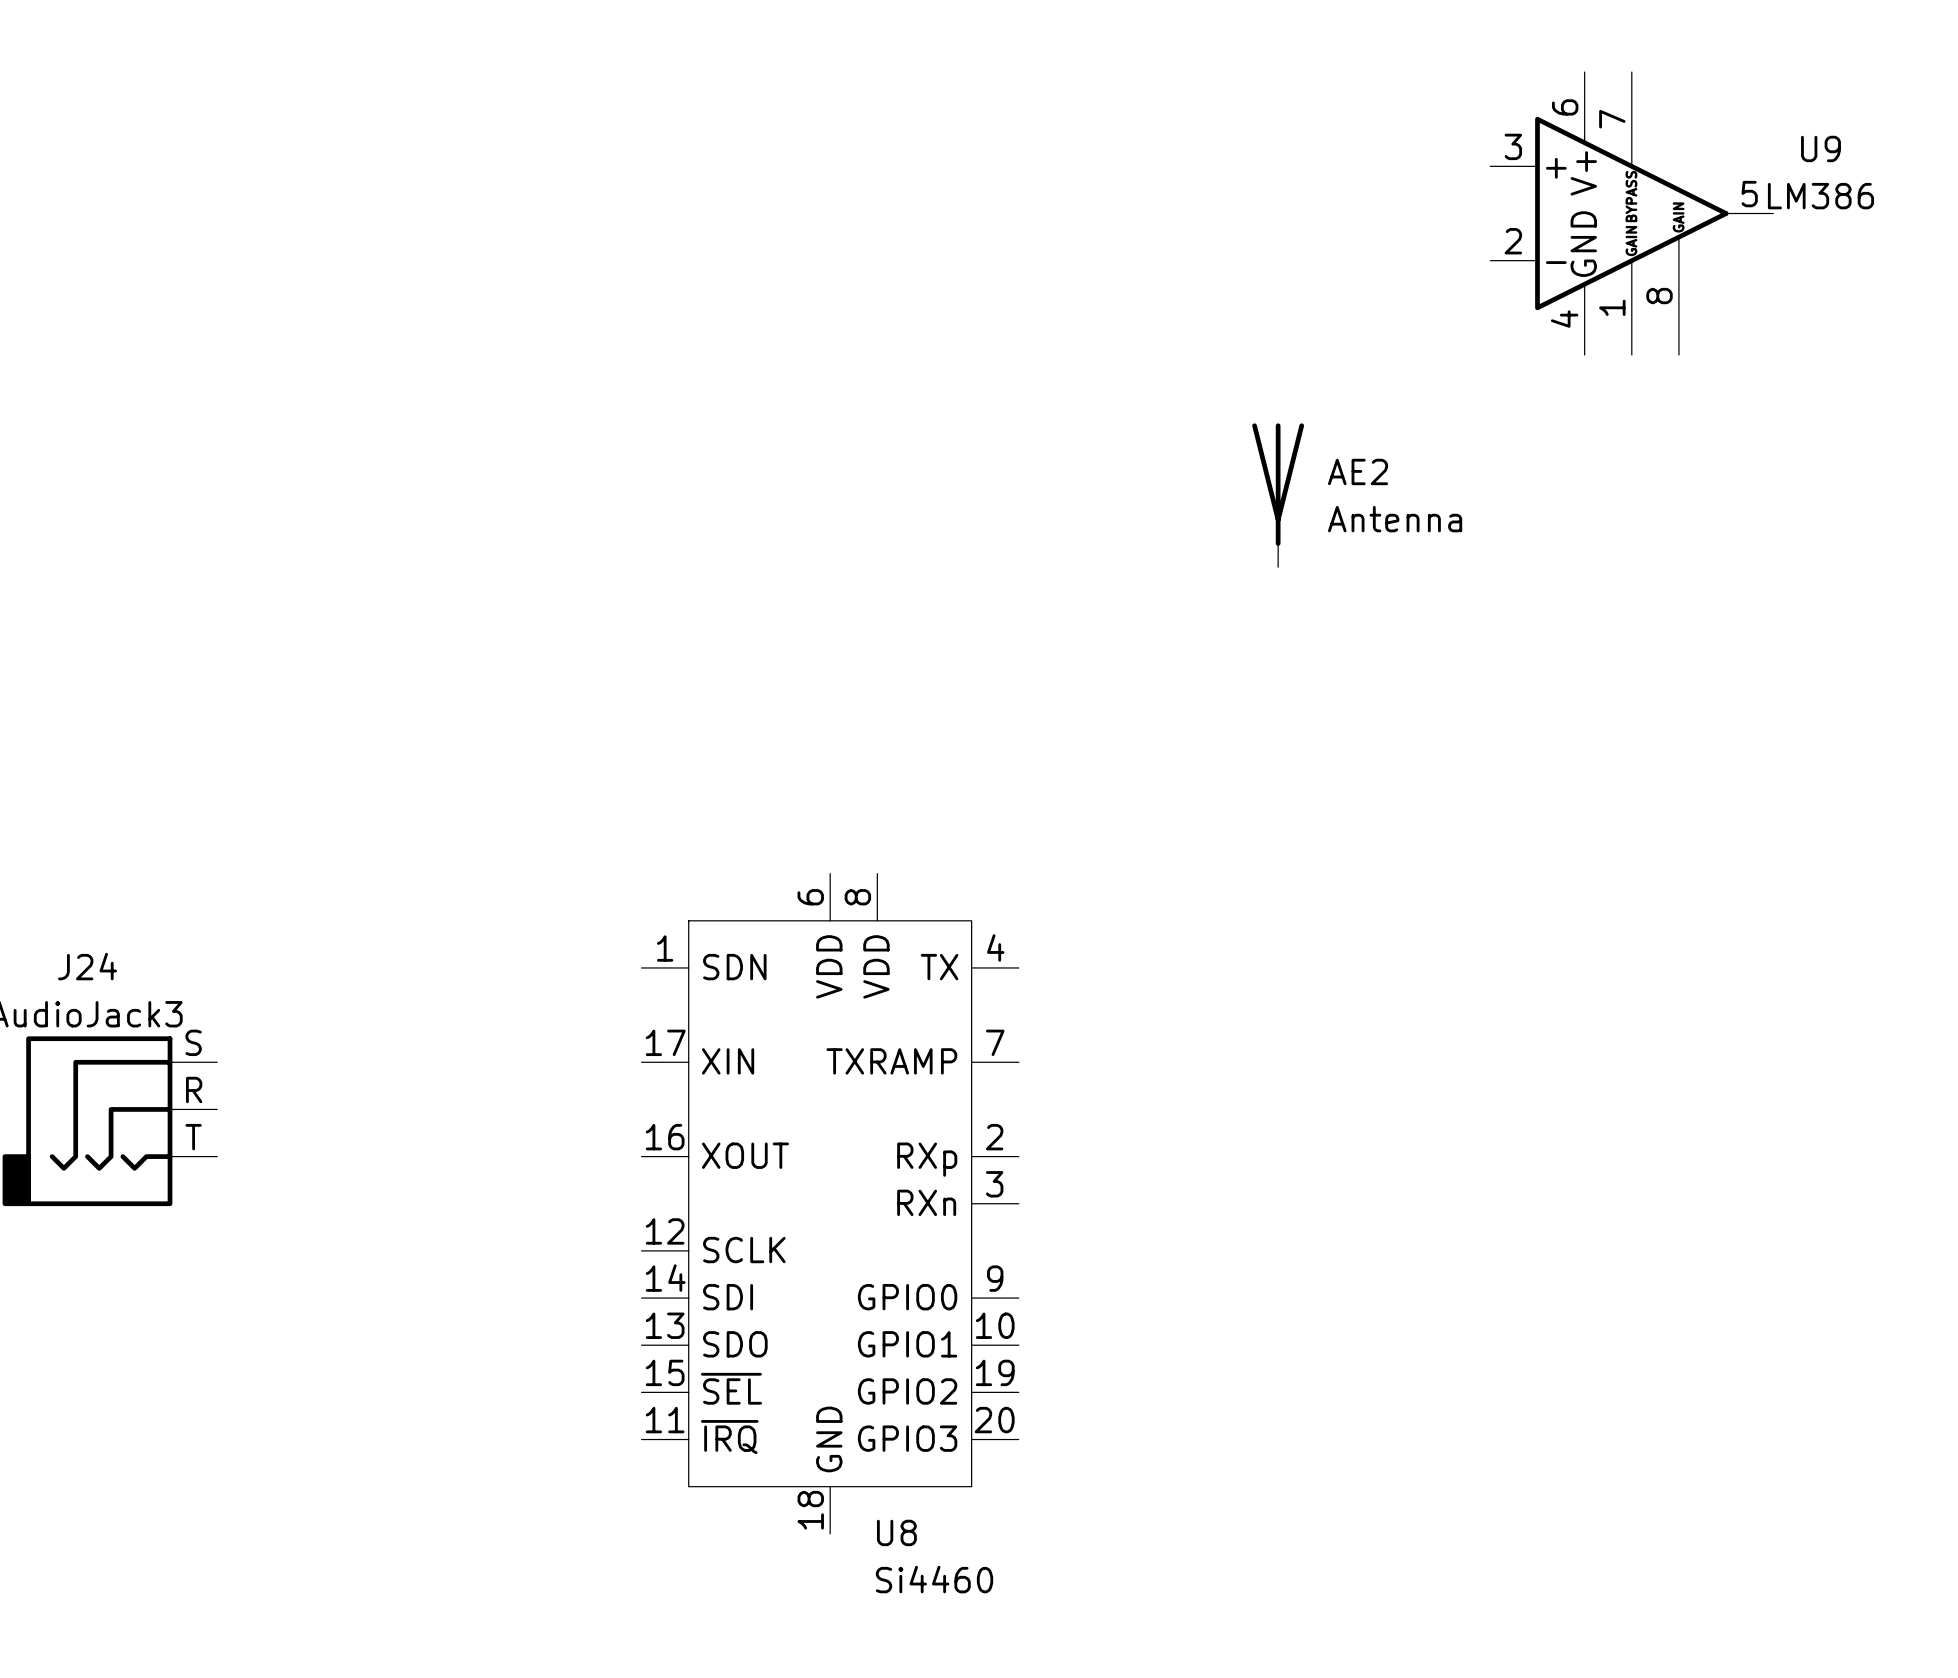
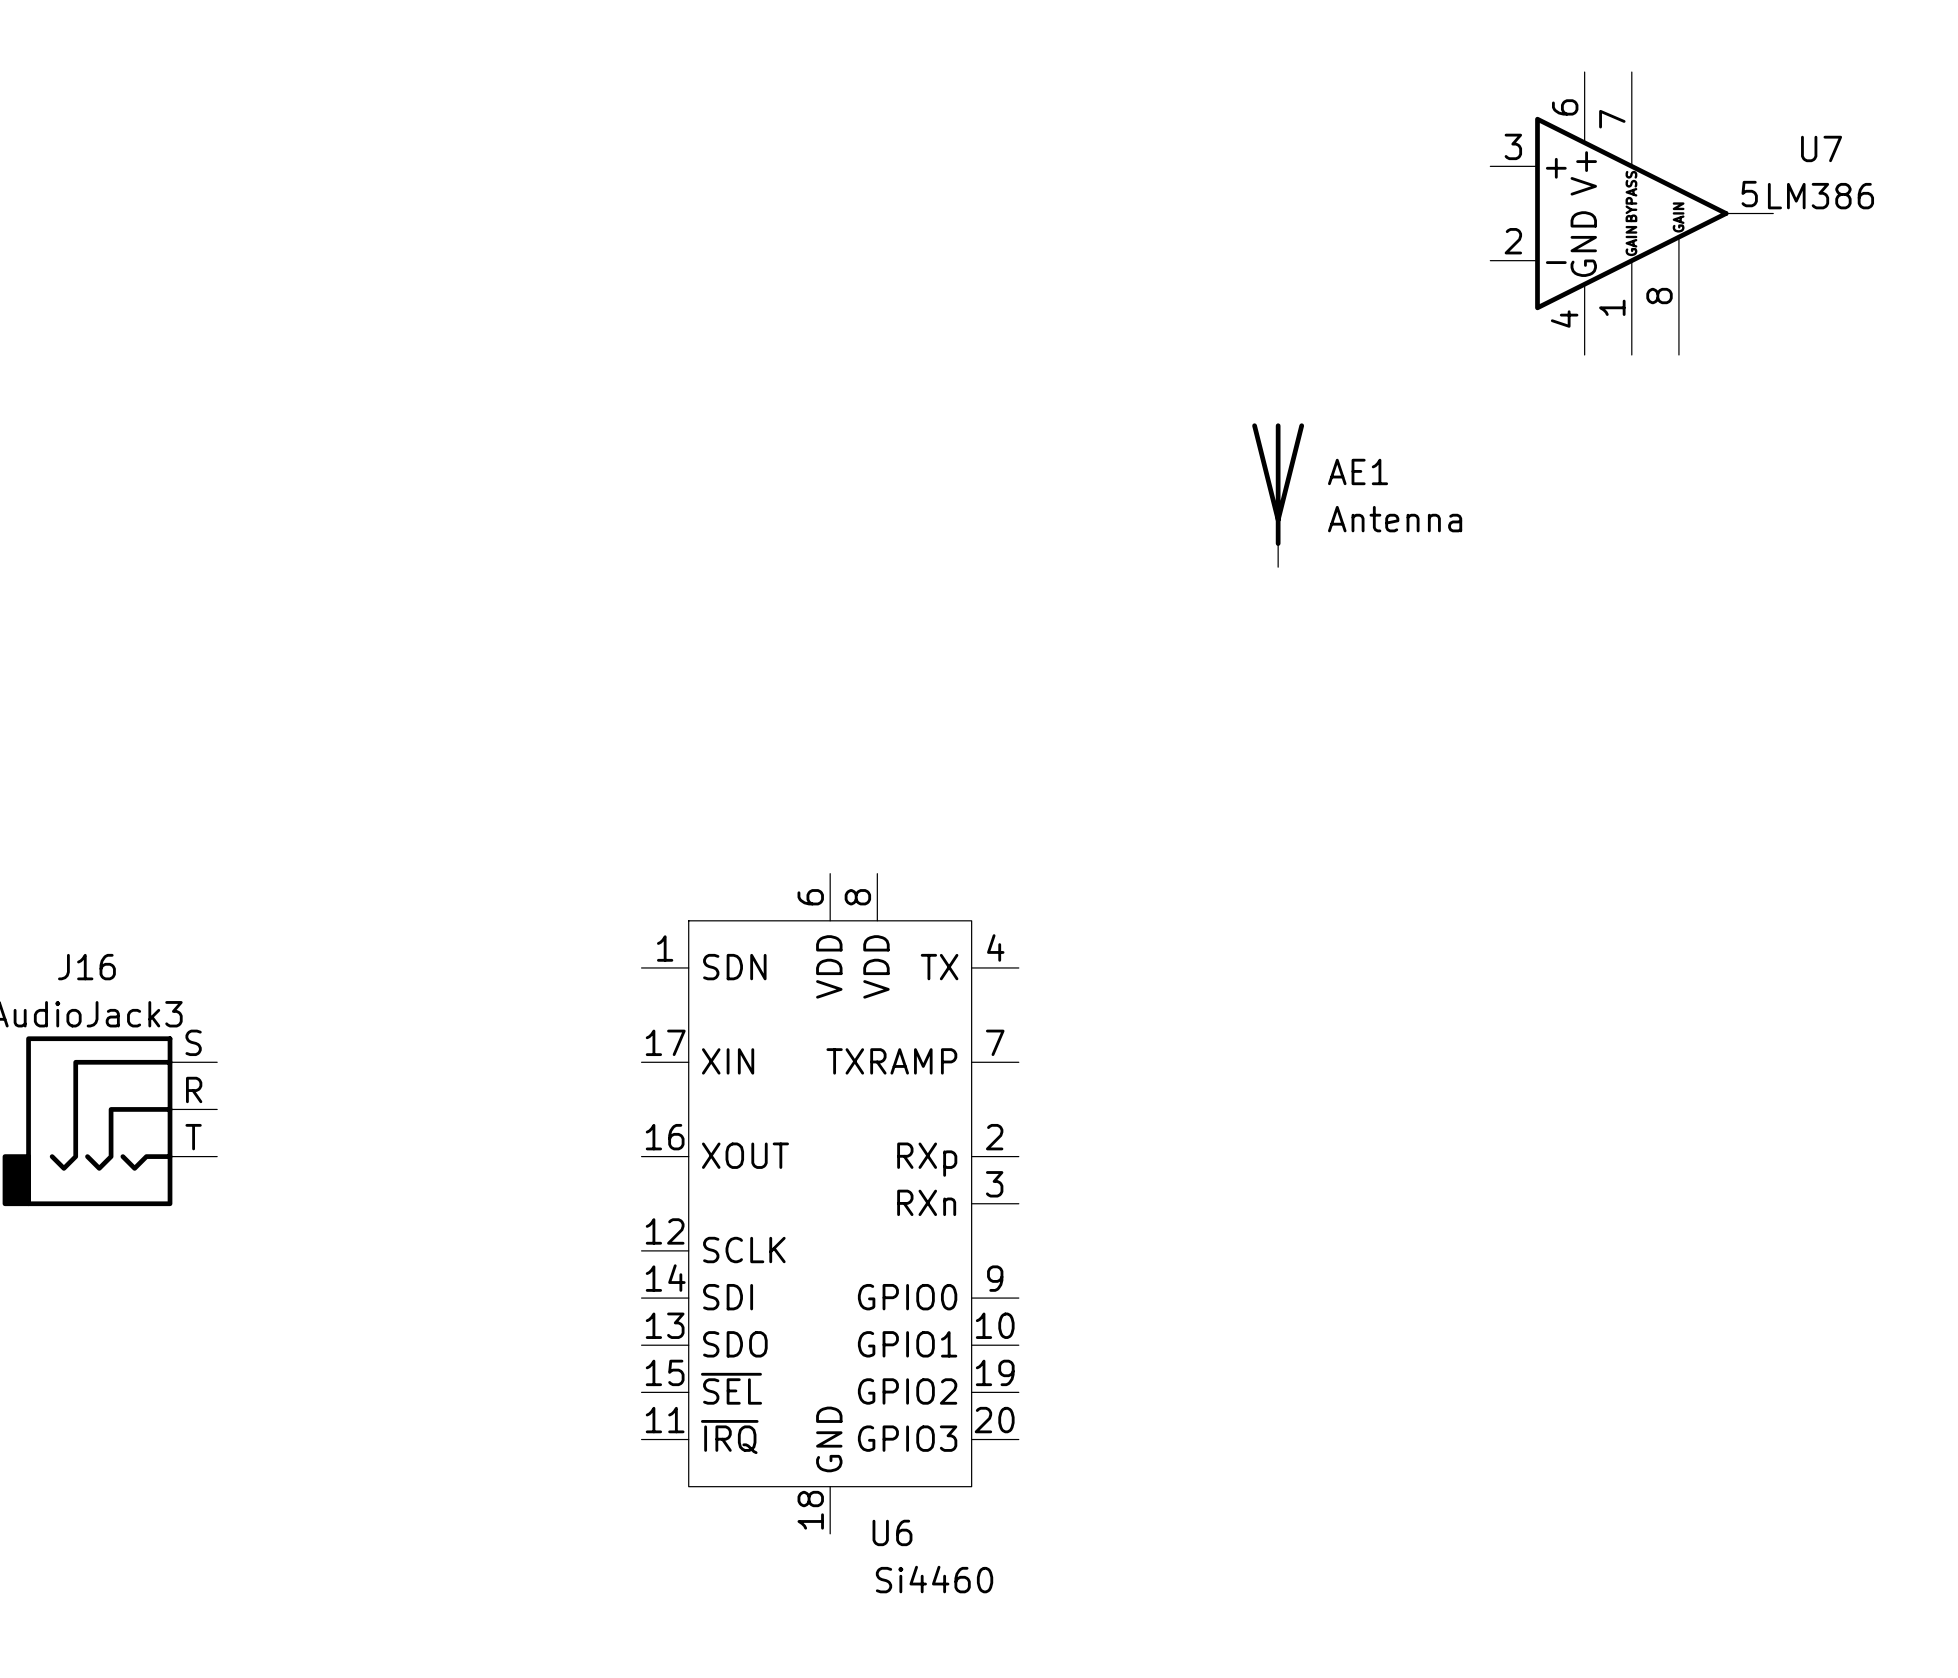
U9 name: U9 (1820, 148) -> U7 (1821, 148)
AE2 name: AE2 (1358, 471) -> AE1 (1358, 471)
J24 name: J24 (87, 966) -> J16 (86, 967)
U8 name: U8 (896, 1532) -> U6 (892, 1532)

